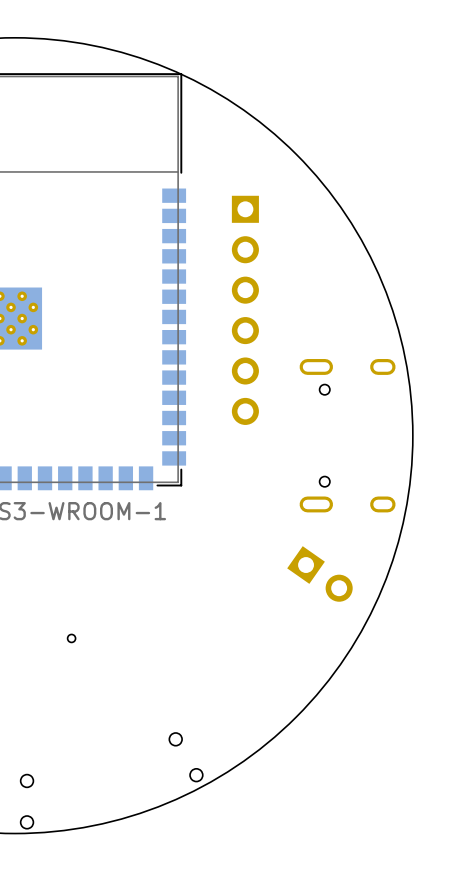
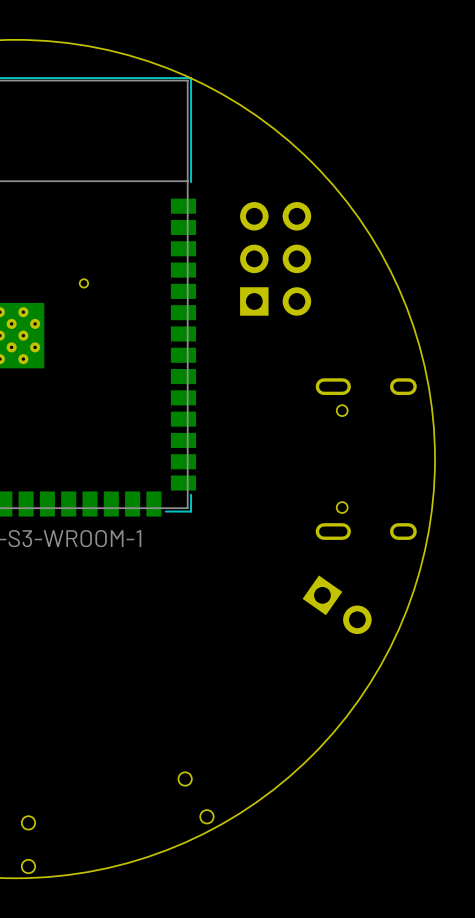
part: none -> (275, 258)
part: (245, 310) -> none
part position: (71, 638) -> (83, 283)

